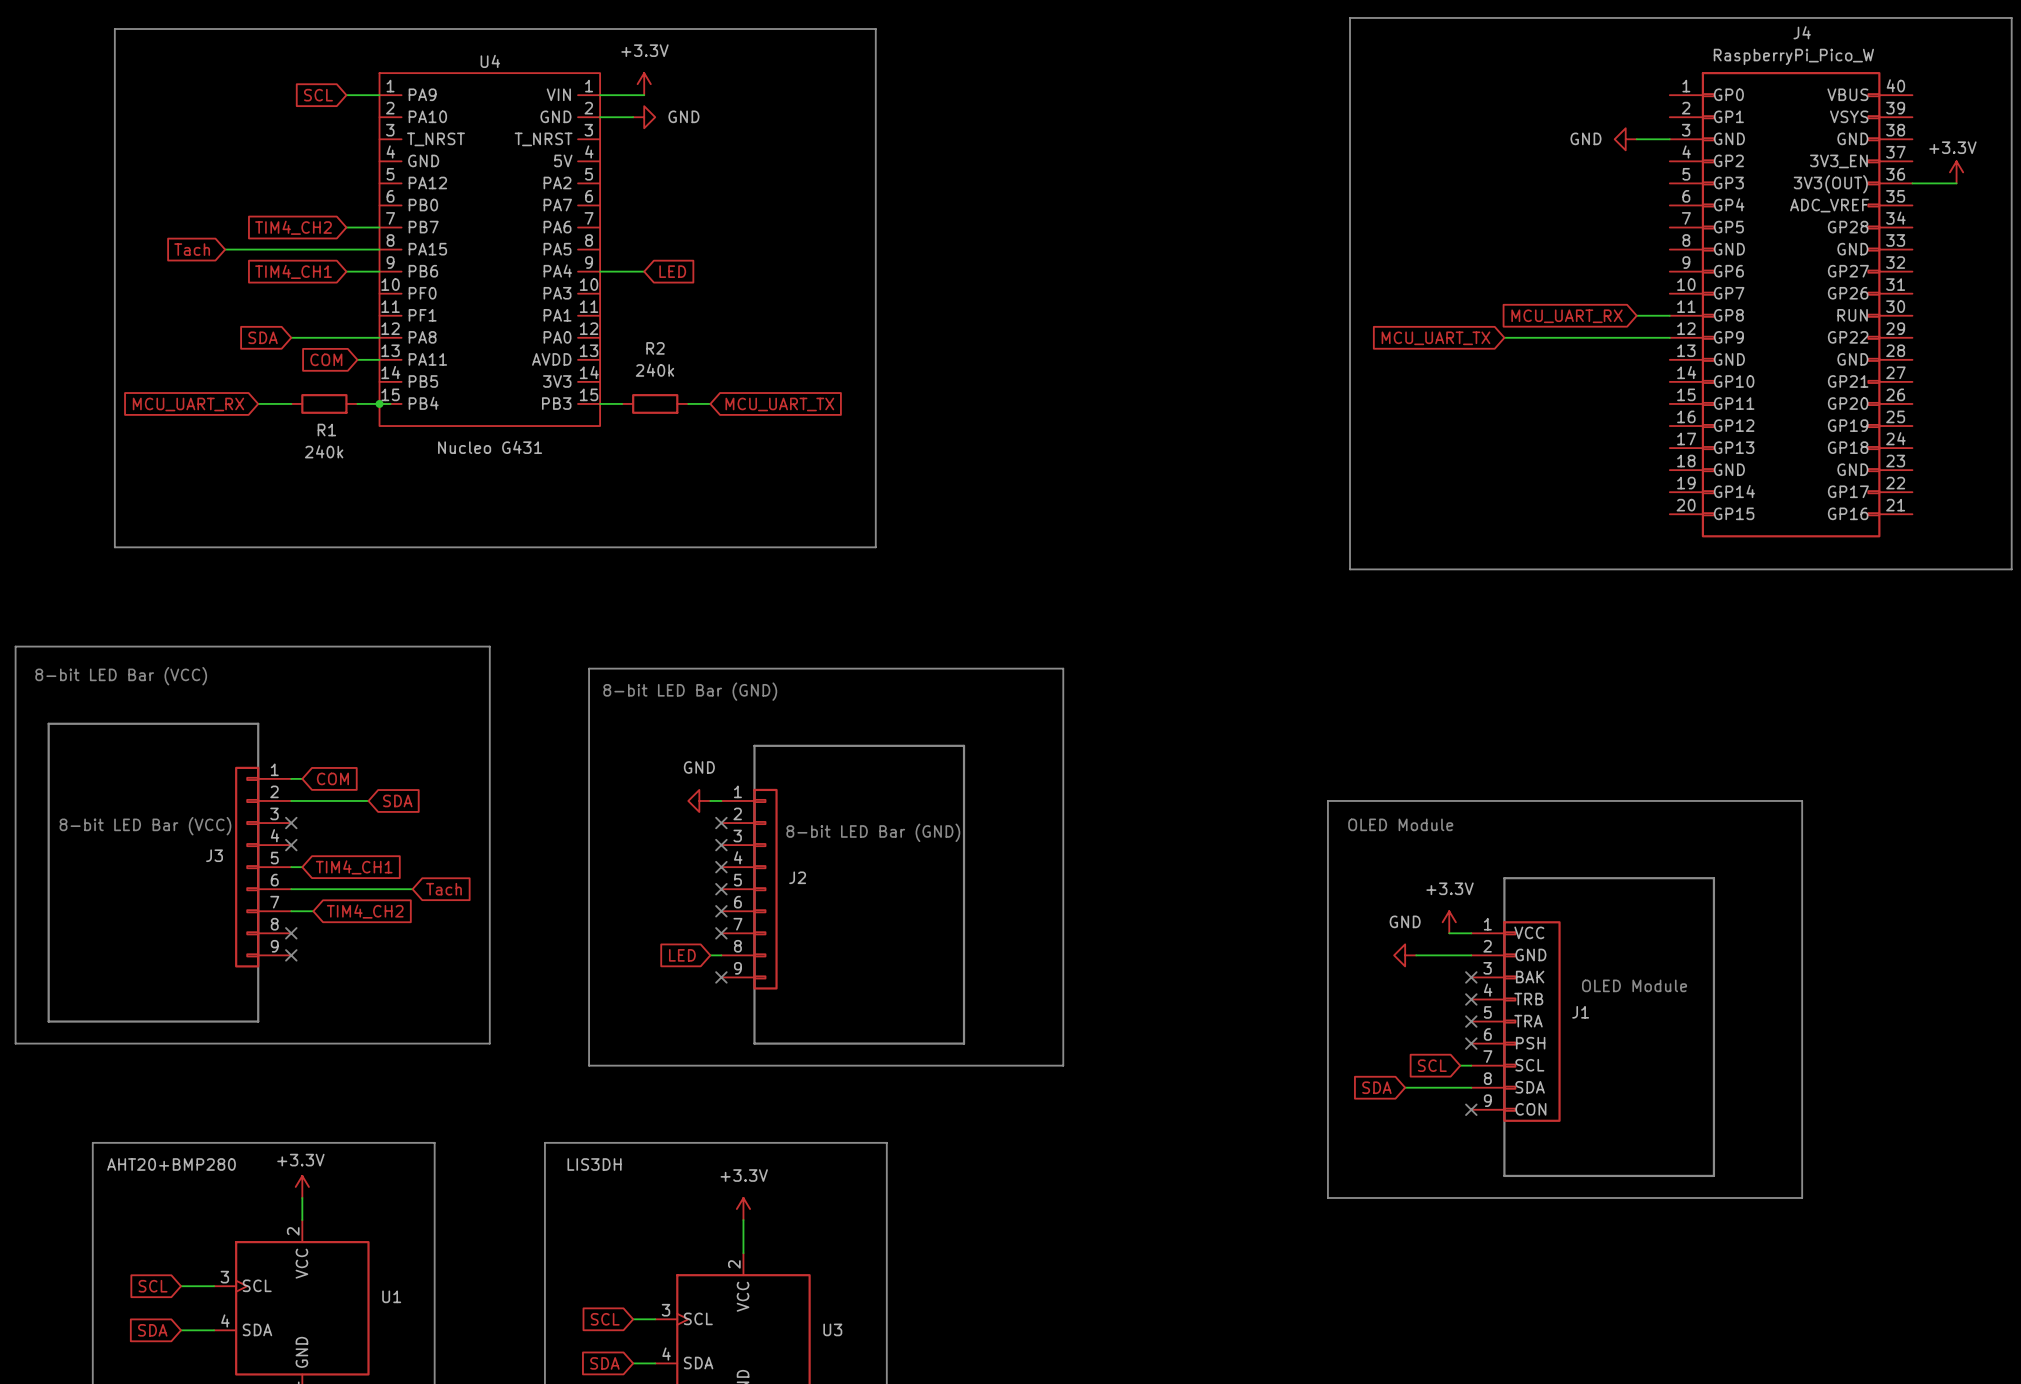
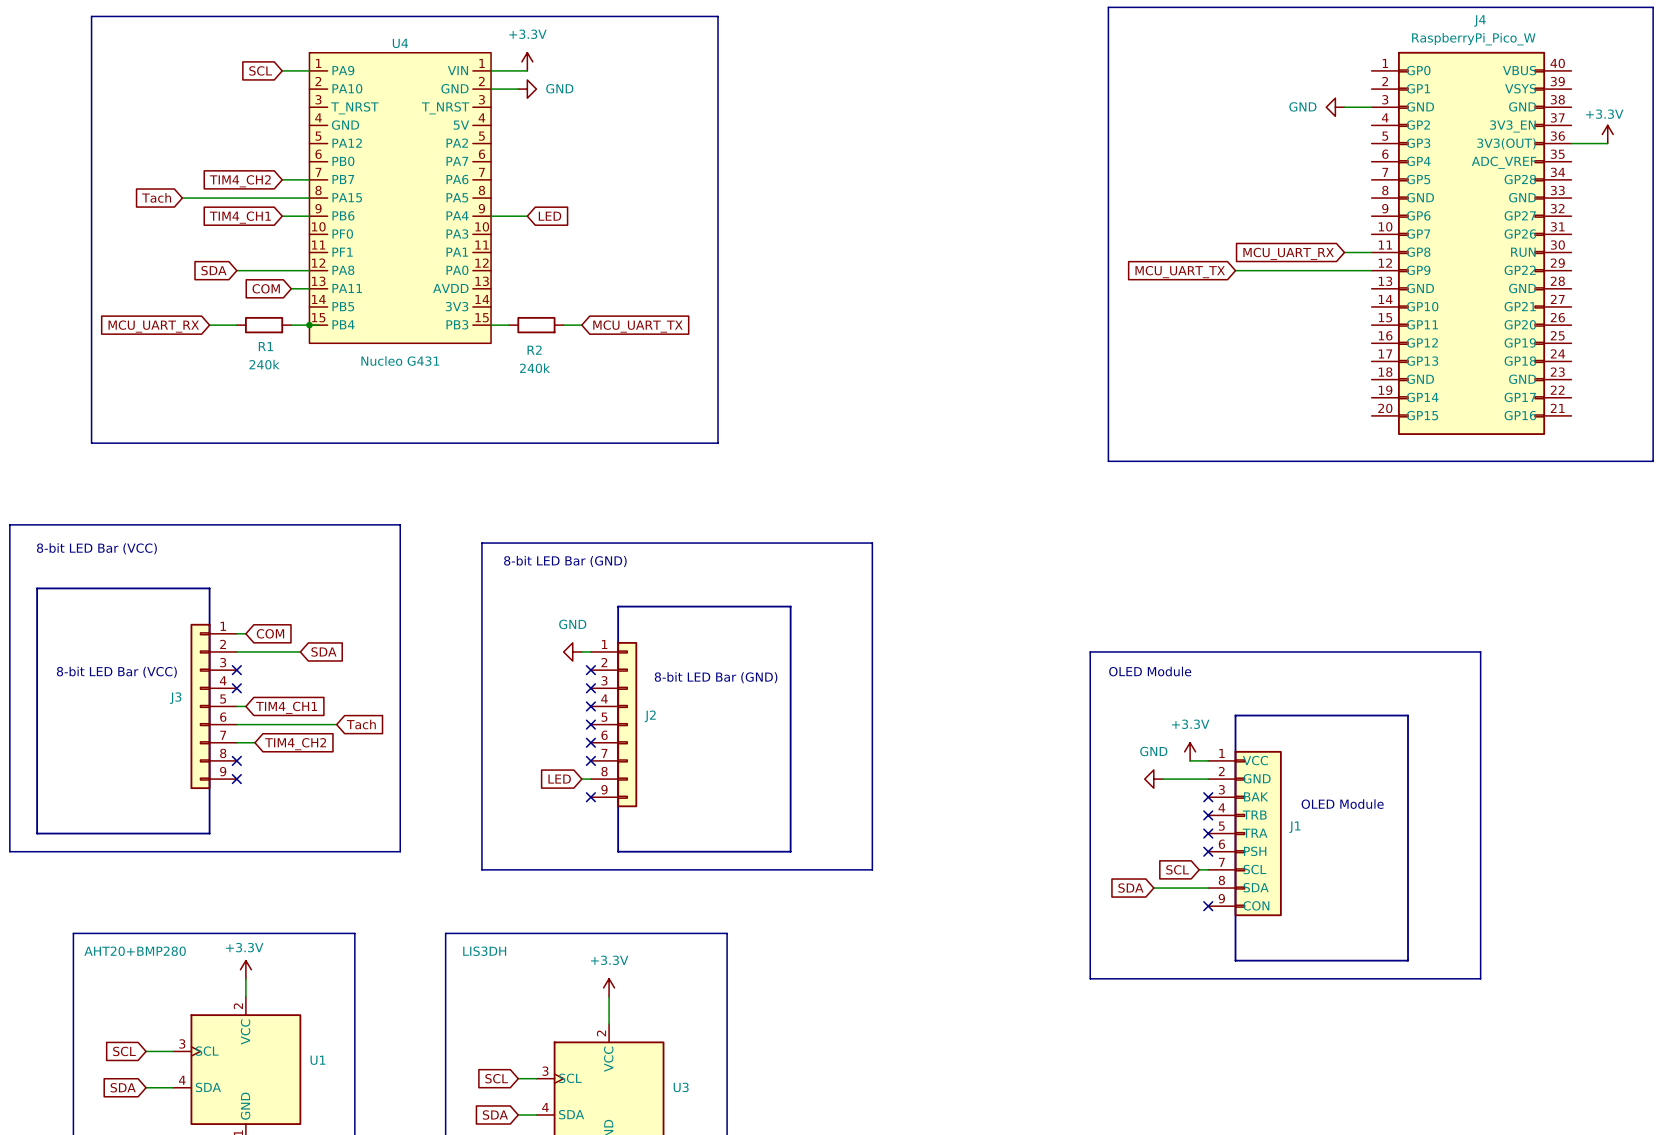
R2 name position: R2 (655, 348) -> R2 (534, 350)
R2 value position: 240k (654, 370) -> 240k (535, 368)

